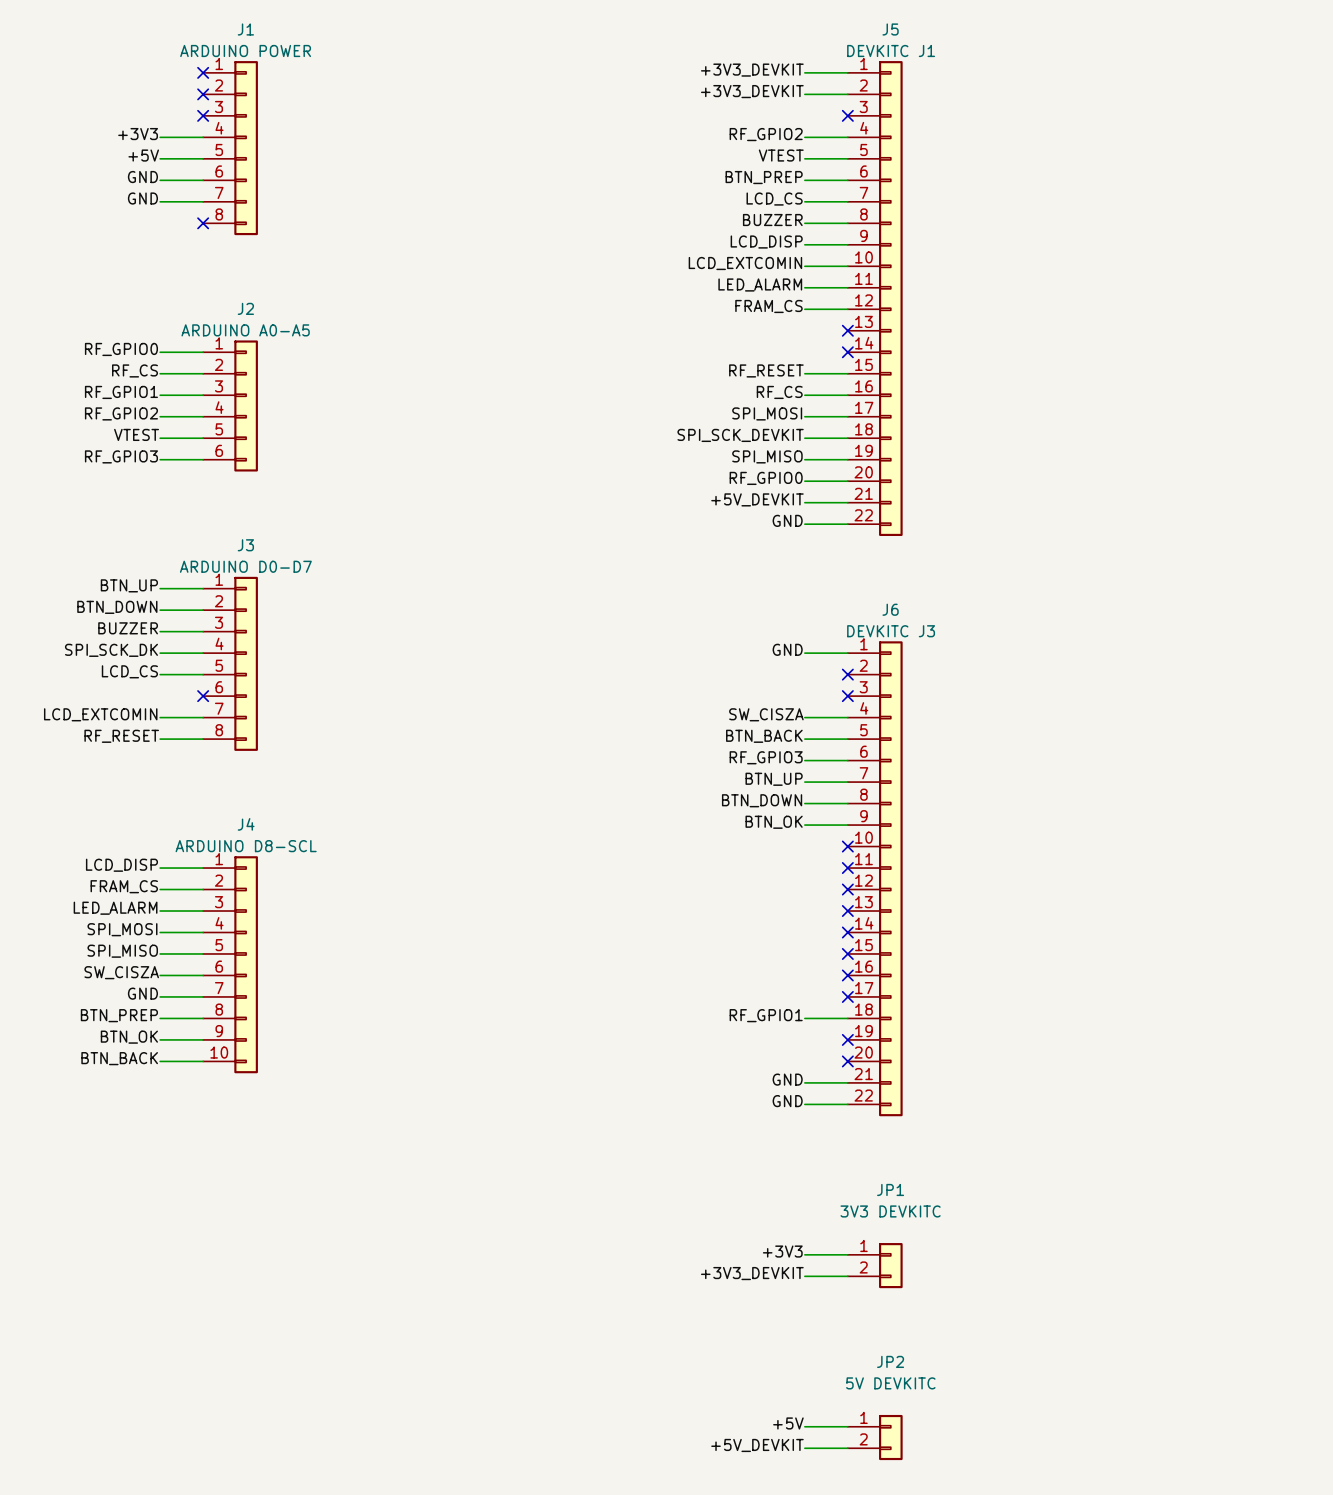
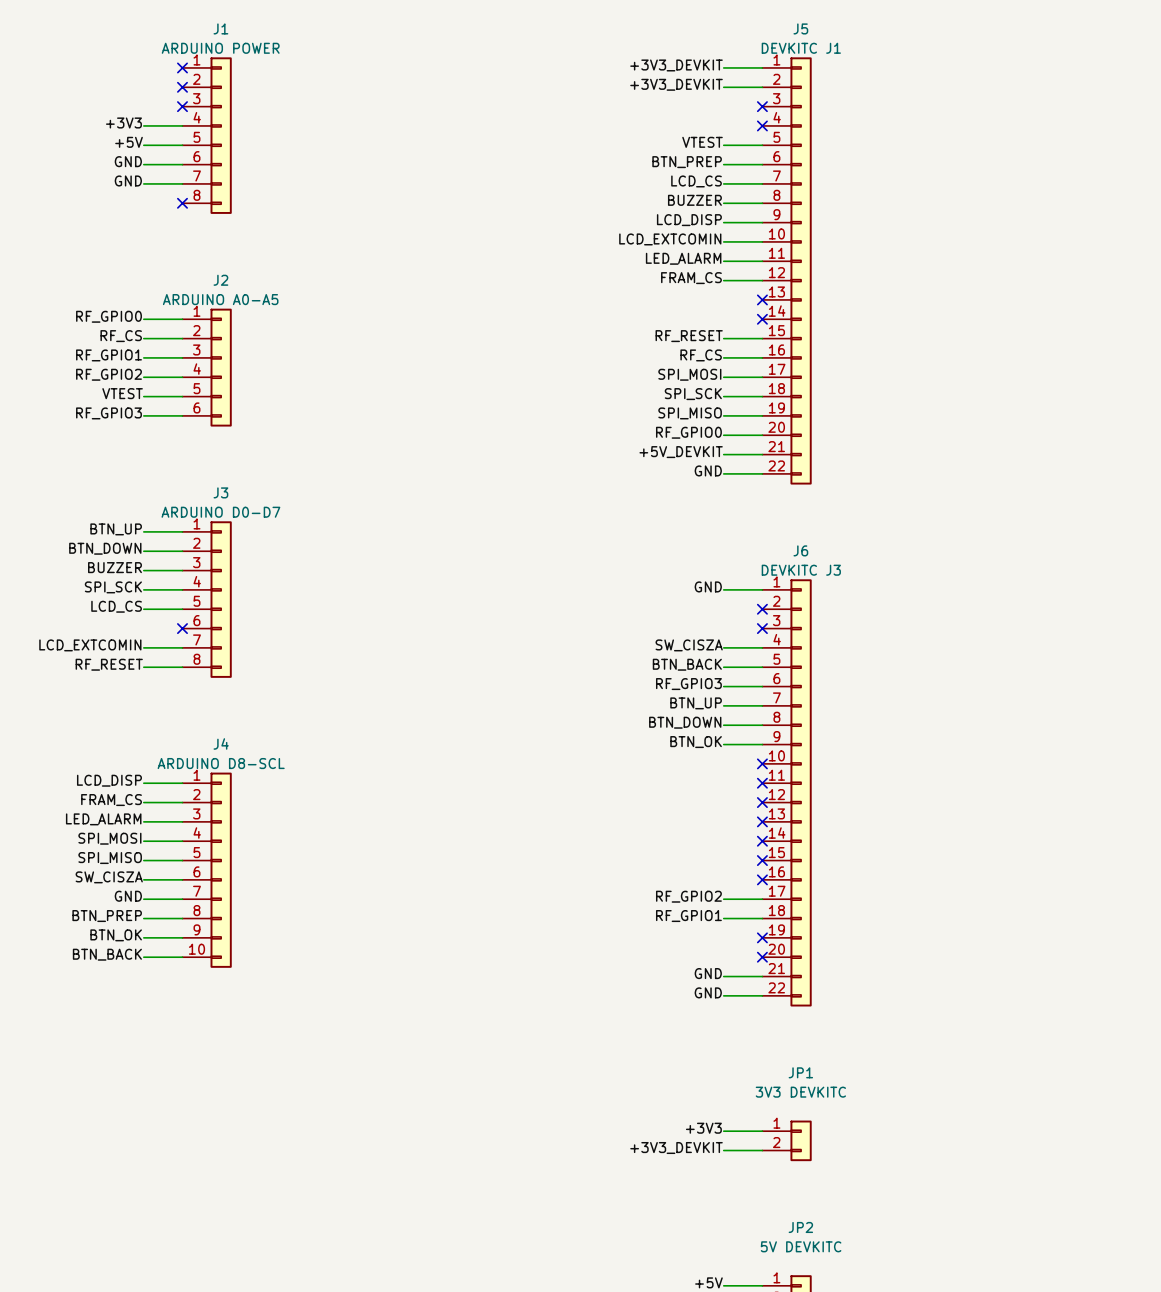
label: RF_GPIO2 (766, 134) -> none
wire: (804, 137) (847, 137) -> none
no-connect mark: none -> (762, 125)
label: SPI_SCK_DEVKIT (740, 435) -> SPI_SCK (693, 394)
label: SPI_SCK_DK (111, 650) -> SPI_SCK (113, 587)
label: none -> RF_GPIO2 (688, 896)
wire: none -> (723, 899) (762, 899)
no-connect mark: (847, 996) -> none

